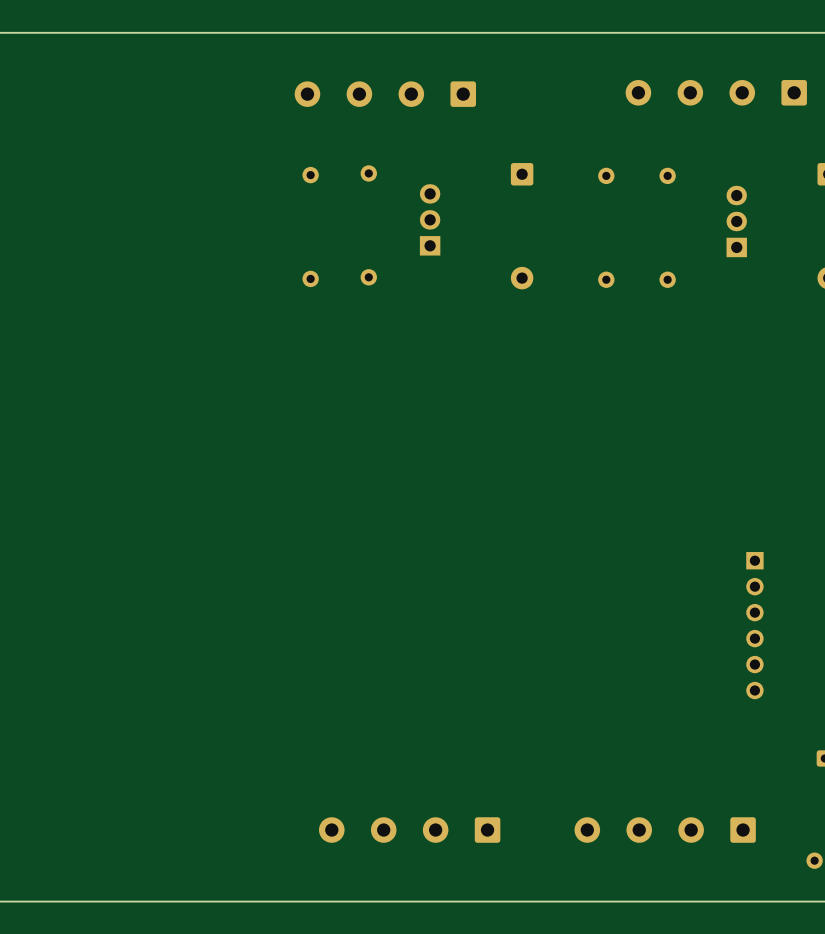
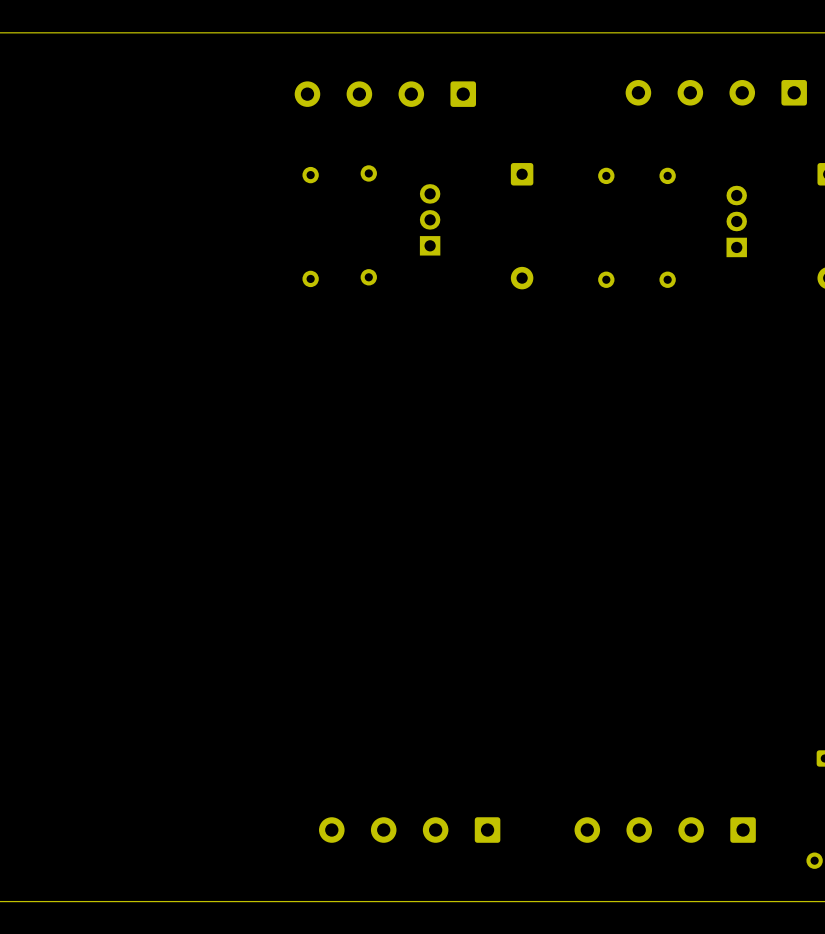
part: (754, 625) -> none

